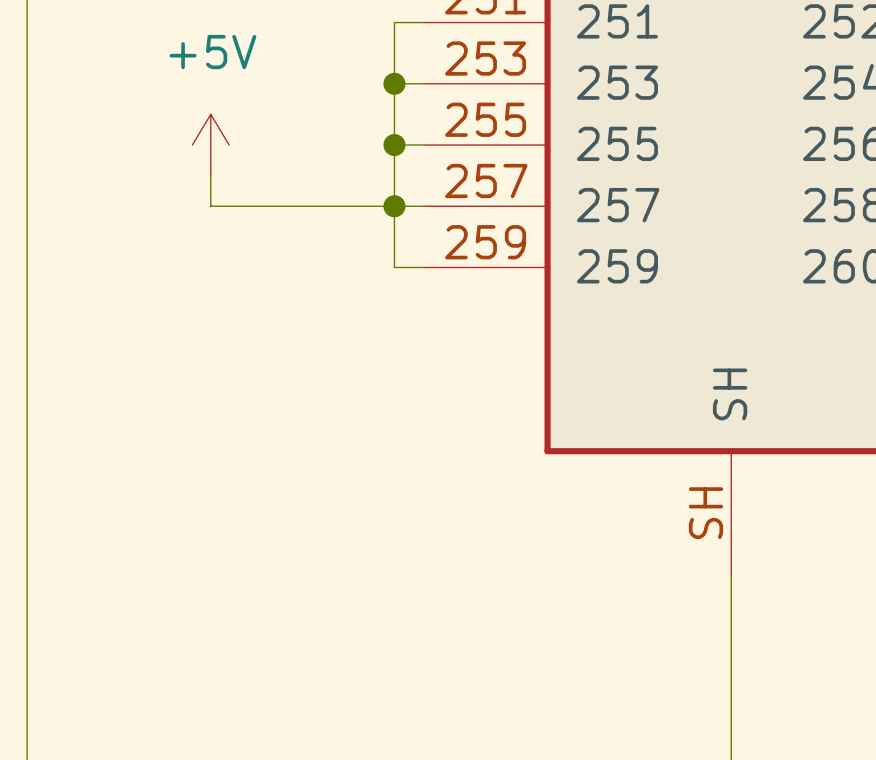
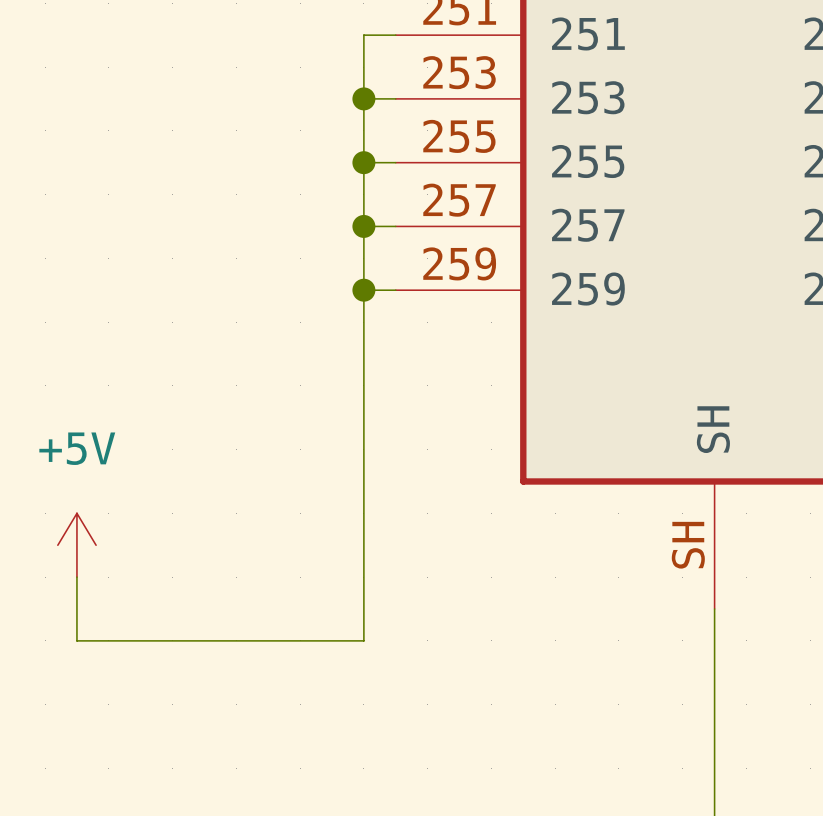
power symbol position: +5V (210, 145) -> +5V (76, 545)
wire: (210, 175) (210, 206) (394, 206) -> none
wire: none -> (363, 290) (363, 640) (76, 640) (76, 577)
junction: none -> (363, 290)

